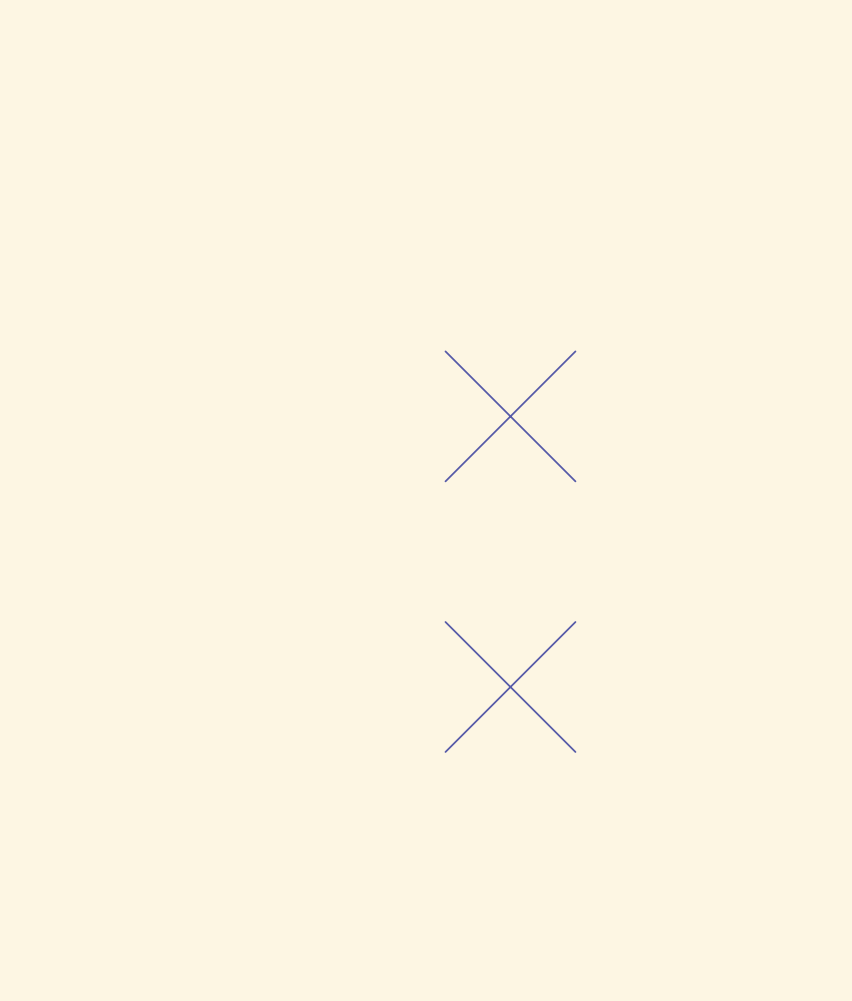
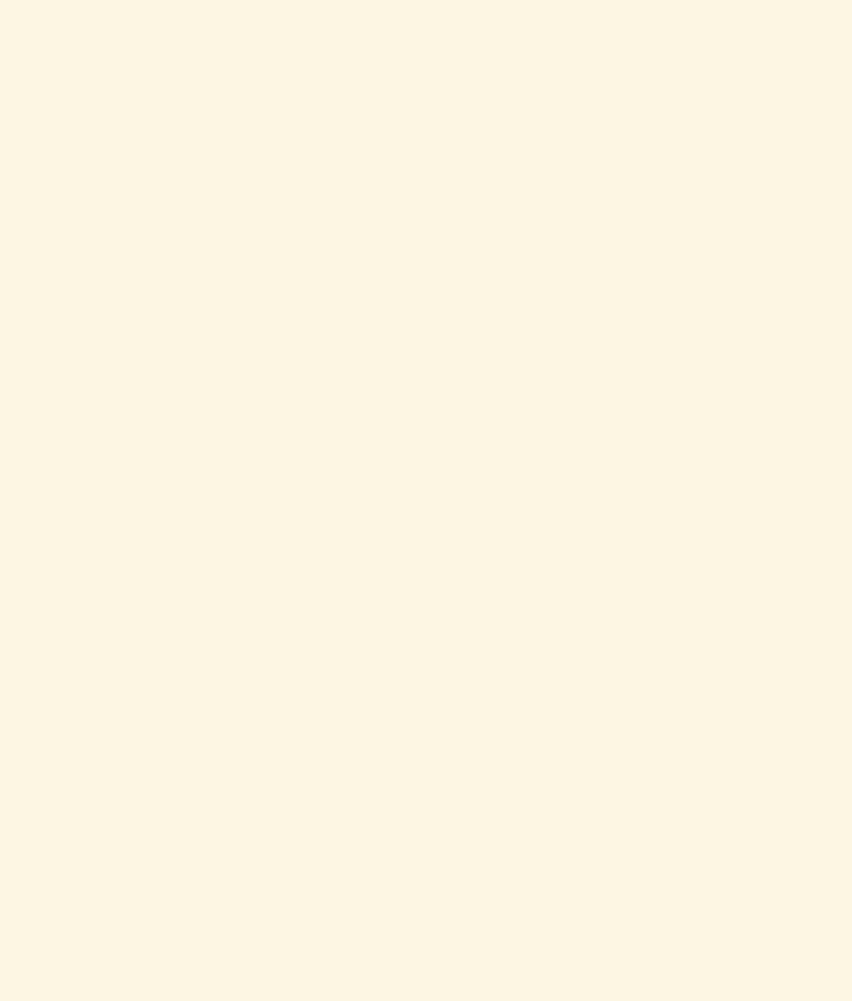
no-connect mark: (510, 416) -> none
no-connect mark: (510, 686) -> none

